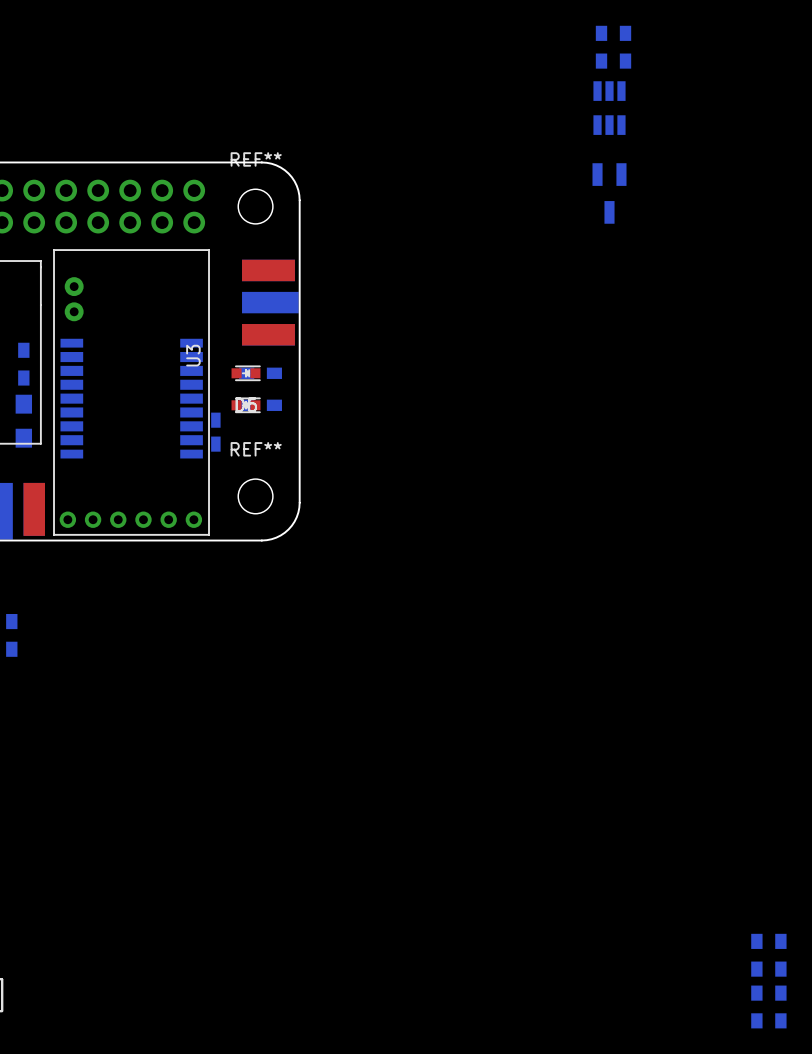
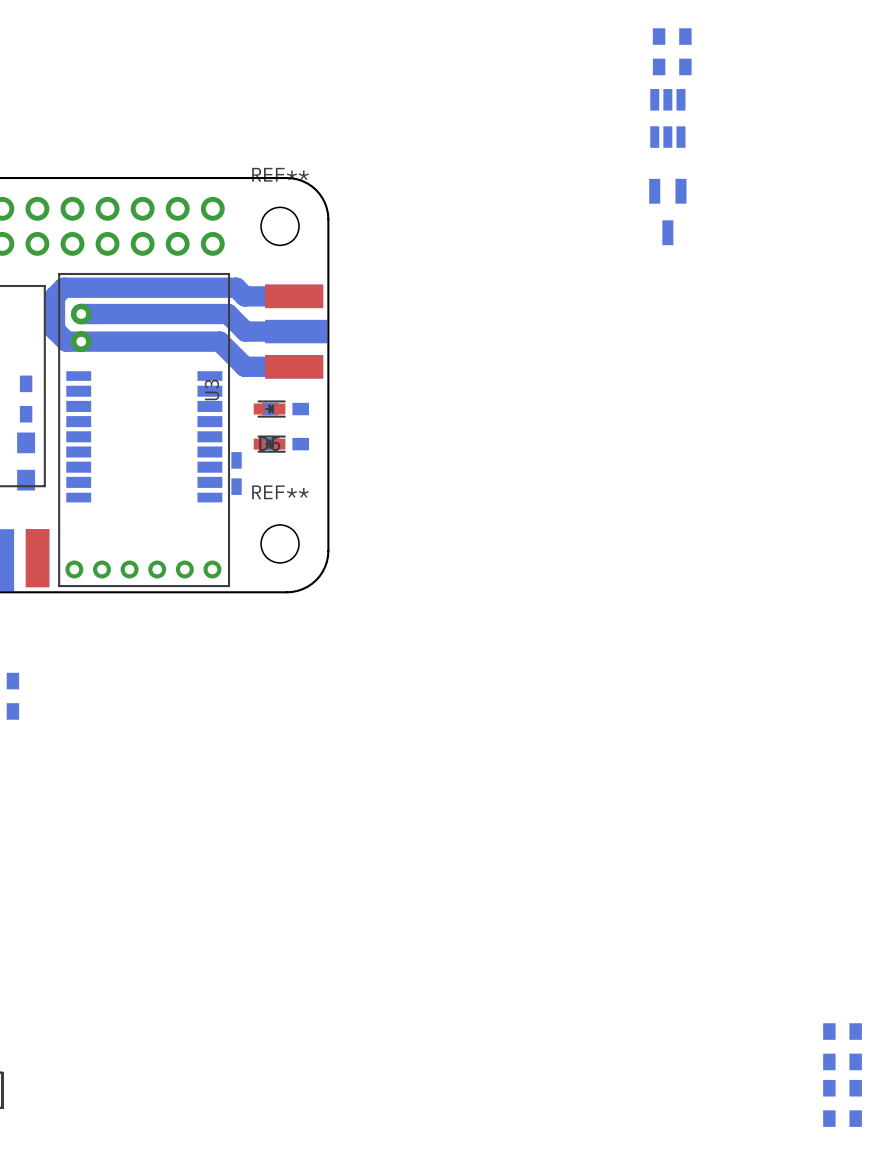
bottom track: none -> (294, 296) (244, 296) (236, 287) (63, 287) (54, 296) (54, 329) (66, 341) (219, 341) (244, 366) (294, 366)
bottom track: none -> (81, 314) (228, 314) (245, 331) (296, 331)

